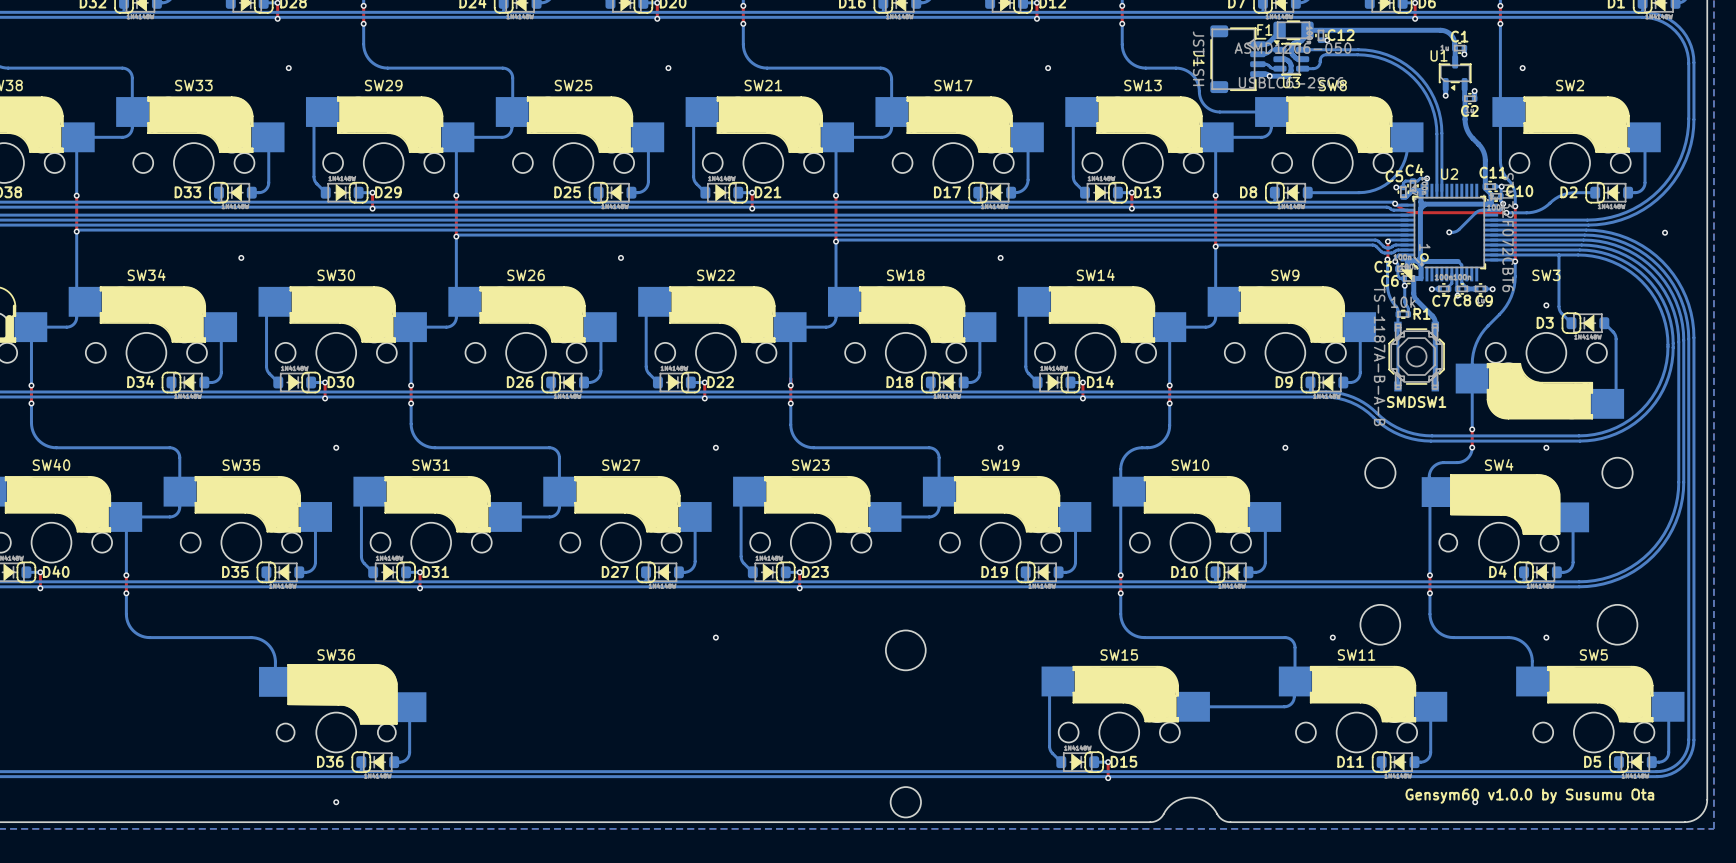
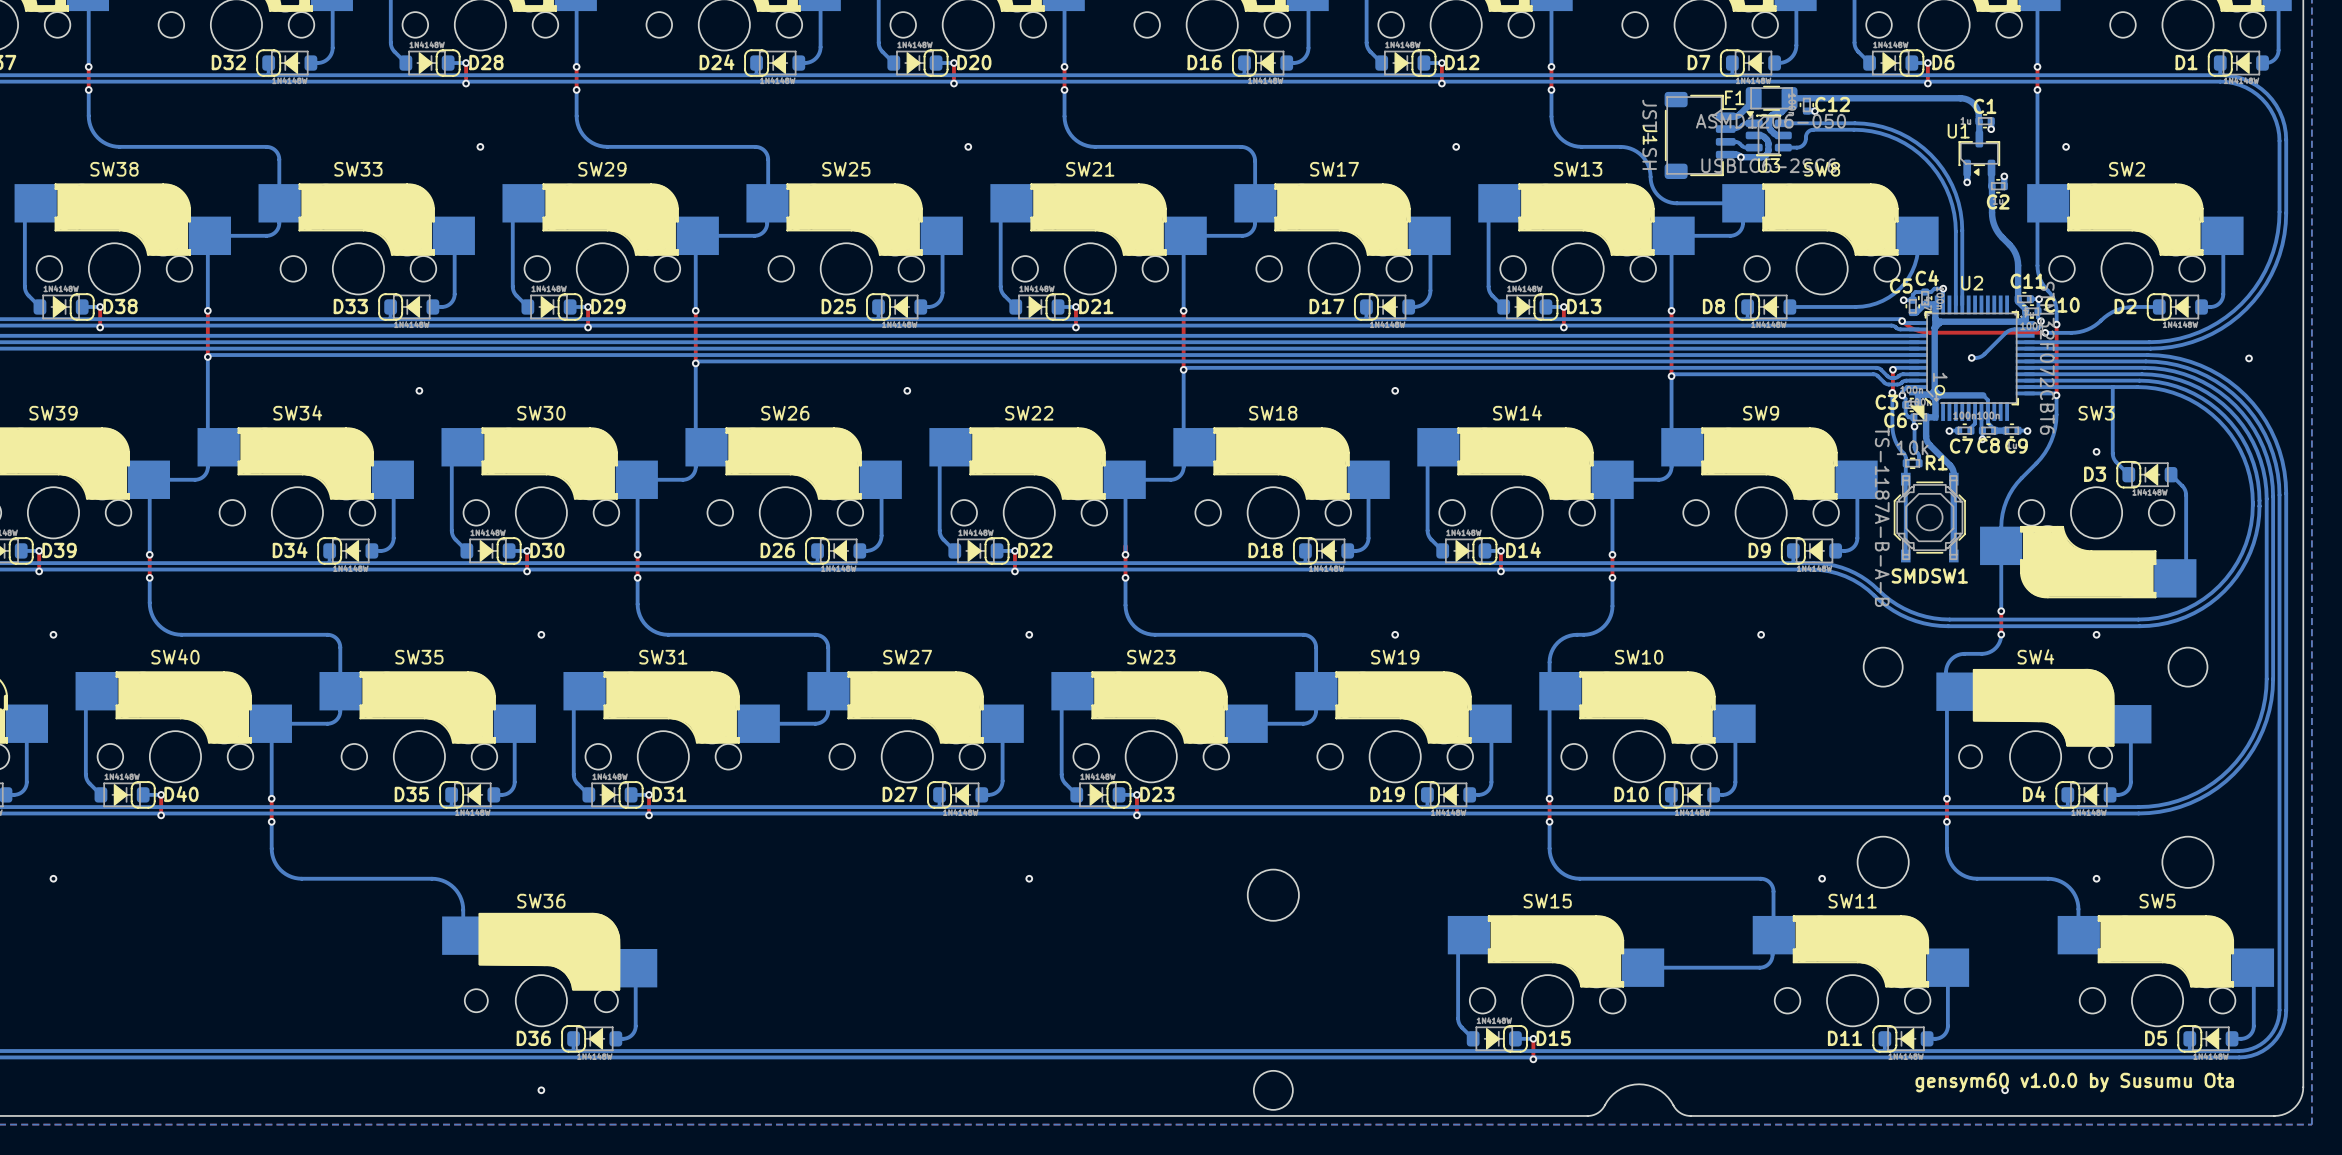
text: Gensym60 v1.0.0 by Susumu Ota (1529, 796) -> gensym60 v1.0.0 by Susumu Ota (2074, 1082)

